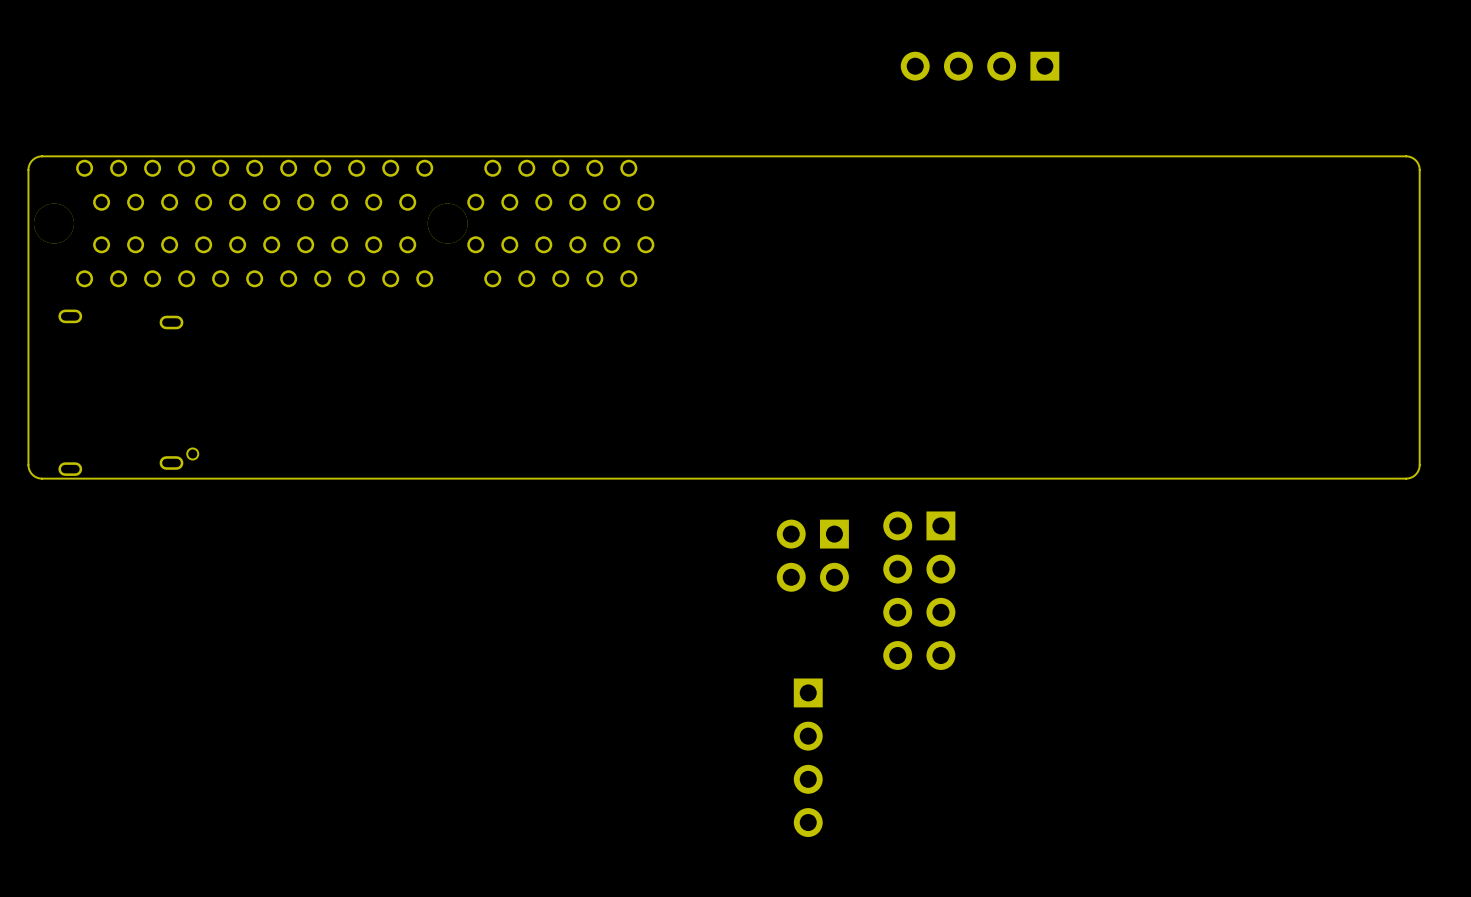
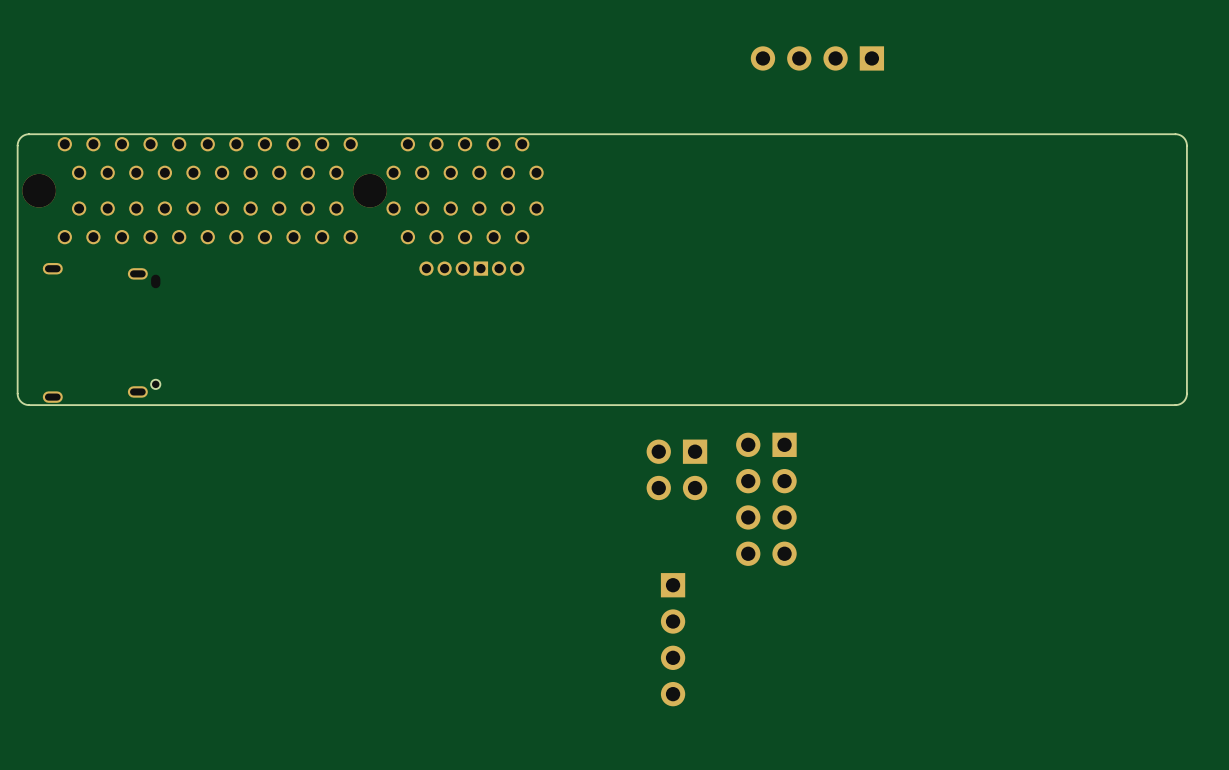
part: none -> (471, 268)

